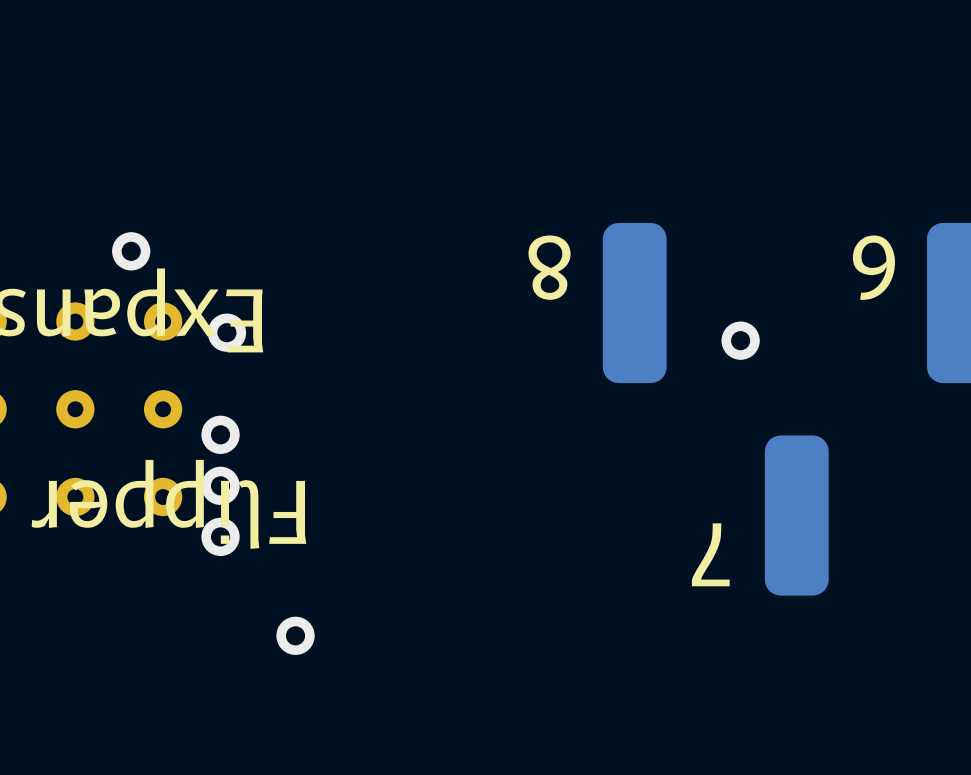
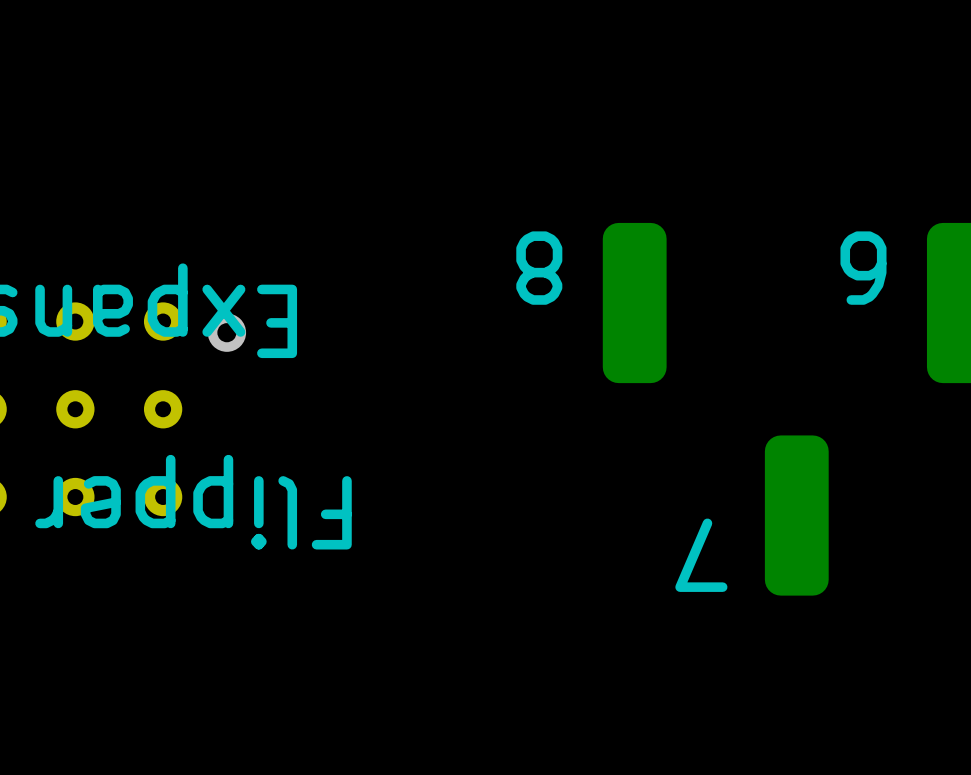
via: (131, 251) -> none
via: (740, 340) -> none
via: (220, 434) -> none
via: (220, 485) -> none
via: (220, 536) -> none
via: (295, 635) -> none

